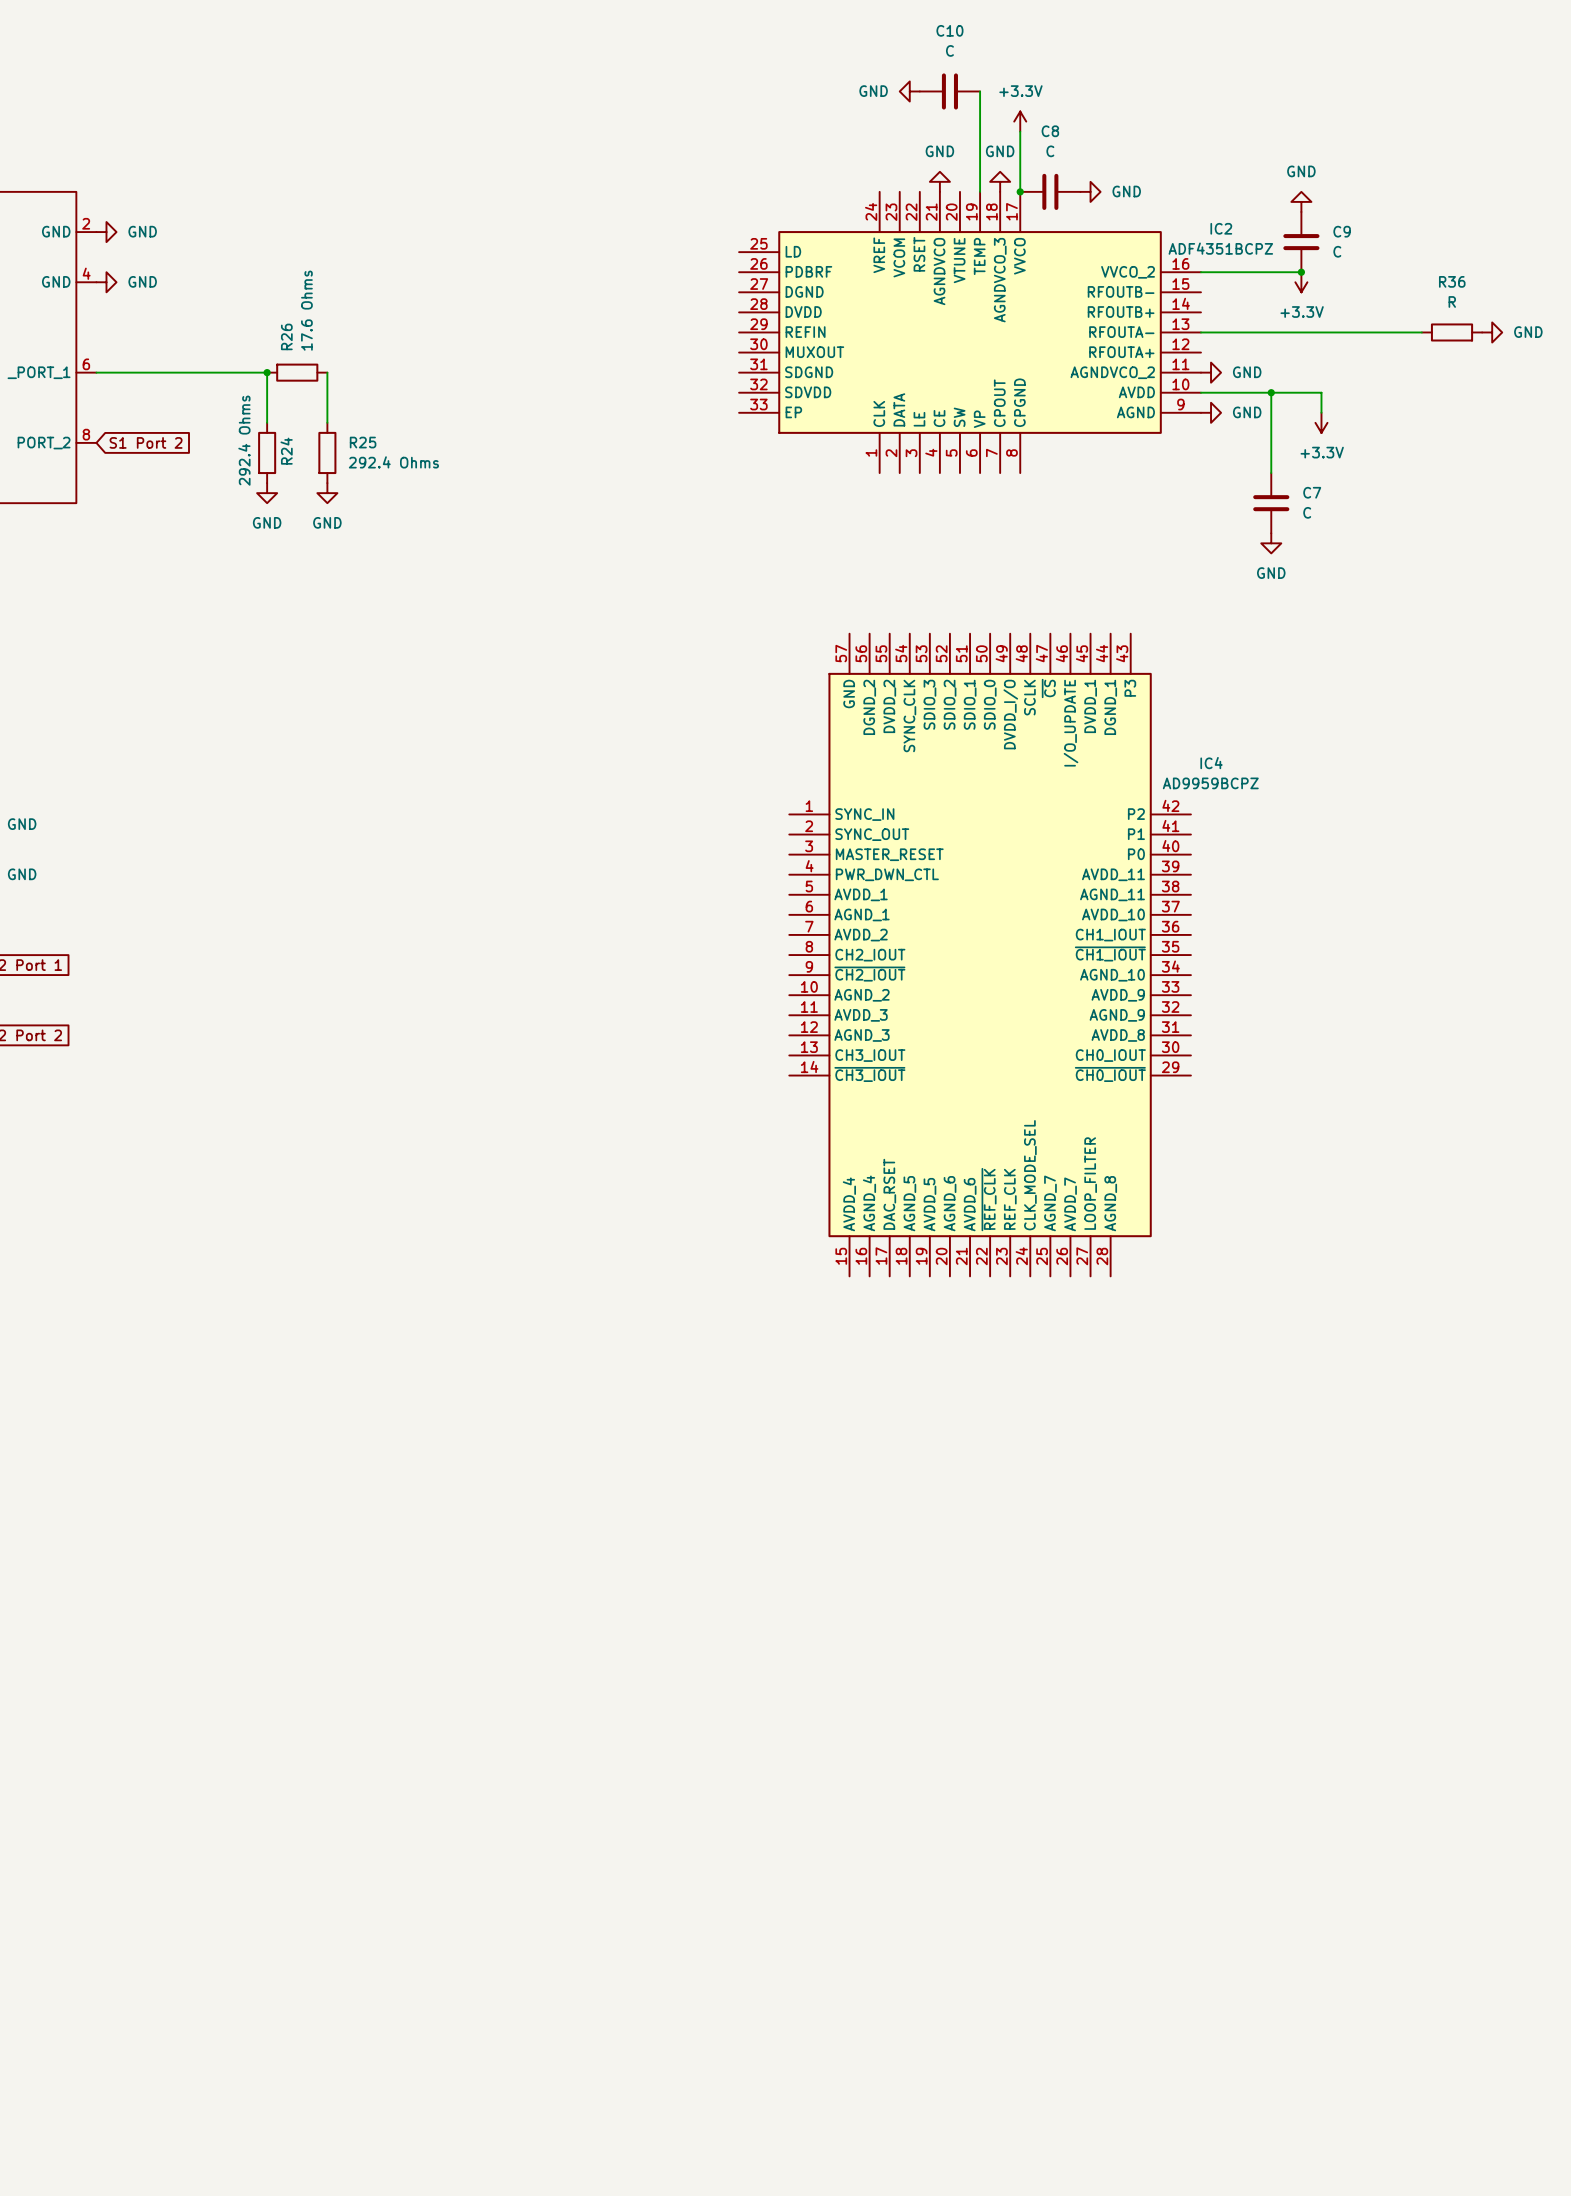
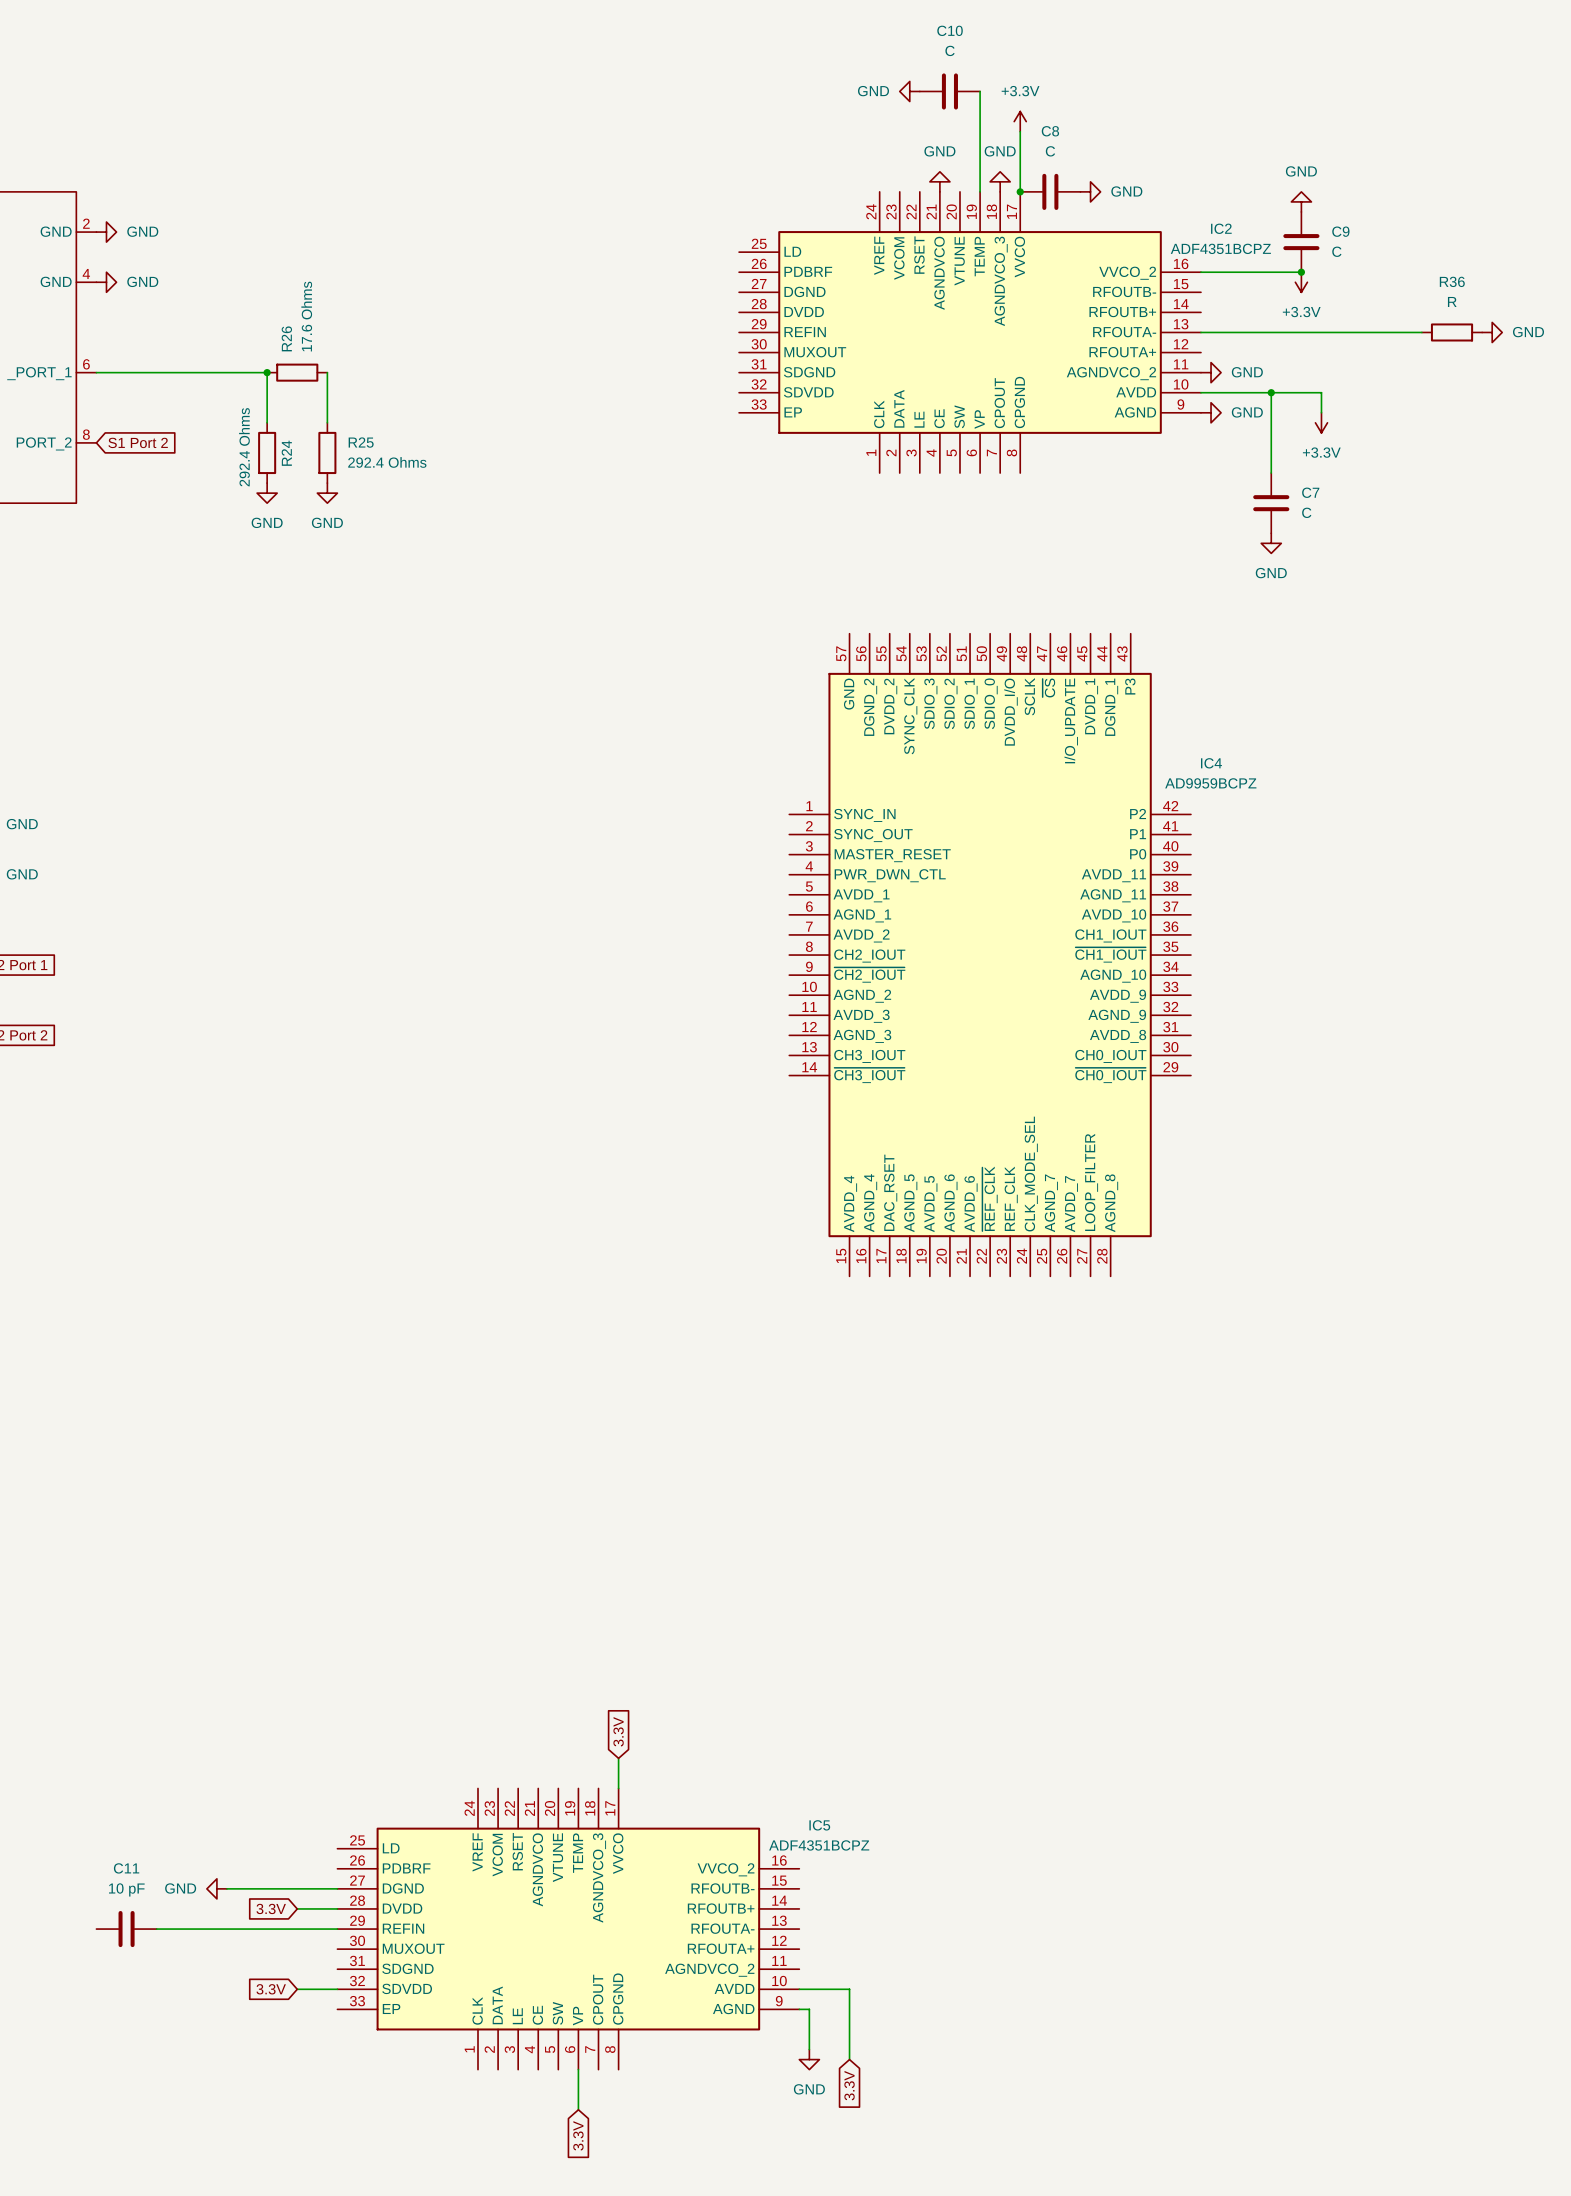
global label: none -> 3.3V (618, 1731)
wire: none -> (618, 1758) (618, 1788)
power symbol: none -> GND (216, 1888)
wire: none -> (226, 1888) (337, 1888)
global label: none -> 3.3V (271, 1908)
wire: none -> (297, 1908) (337, 1908)
C11: none -> 10 pF (126, 1929)
wire: none -> (156, 1929) (337, 1929)
IC5: none -> ADF4351BCPZ (568, 1929)
global label: none -> 3.3V (271, 1989)
wire: none -> (297, 1989) (337, 1989)
wire: none -> (799, 1989) (849, 1989) (849, 2059)
wire: none -> (799, 2009) (809, 2009) (809, 2049)
power symbol: none -> GND (809, 2059)
wire: none -> (578, 2069) (578, 2109)
global label: none -> 3.3V (849, 2085)
global label: none -> 3.3V (578, 2135)

